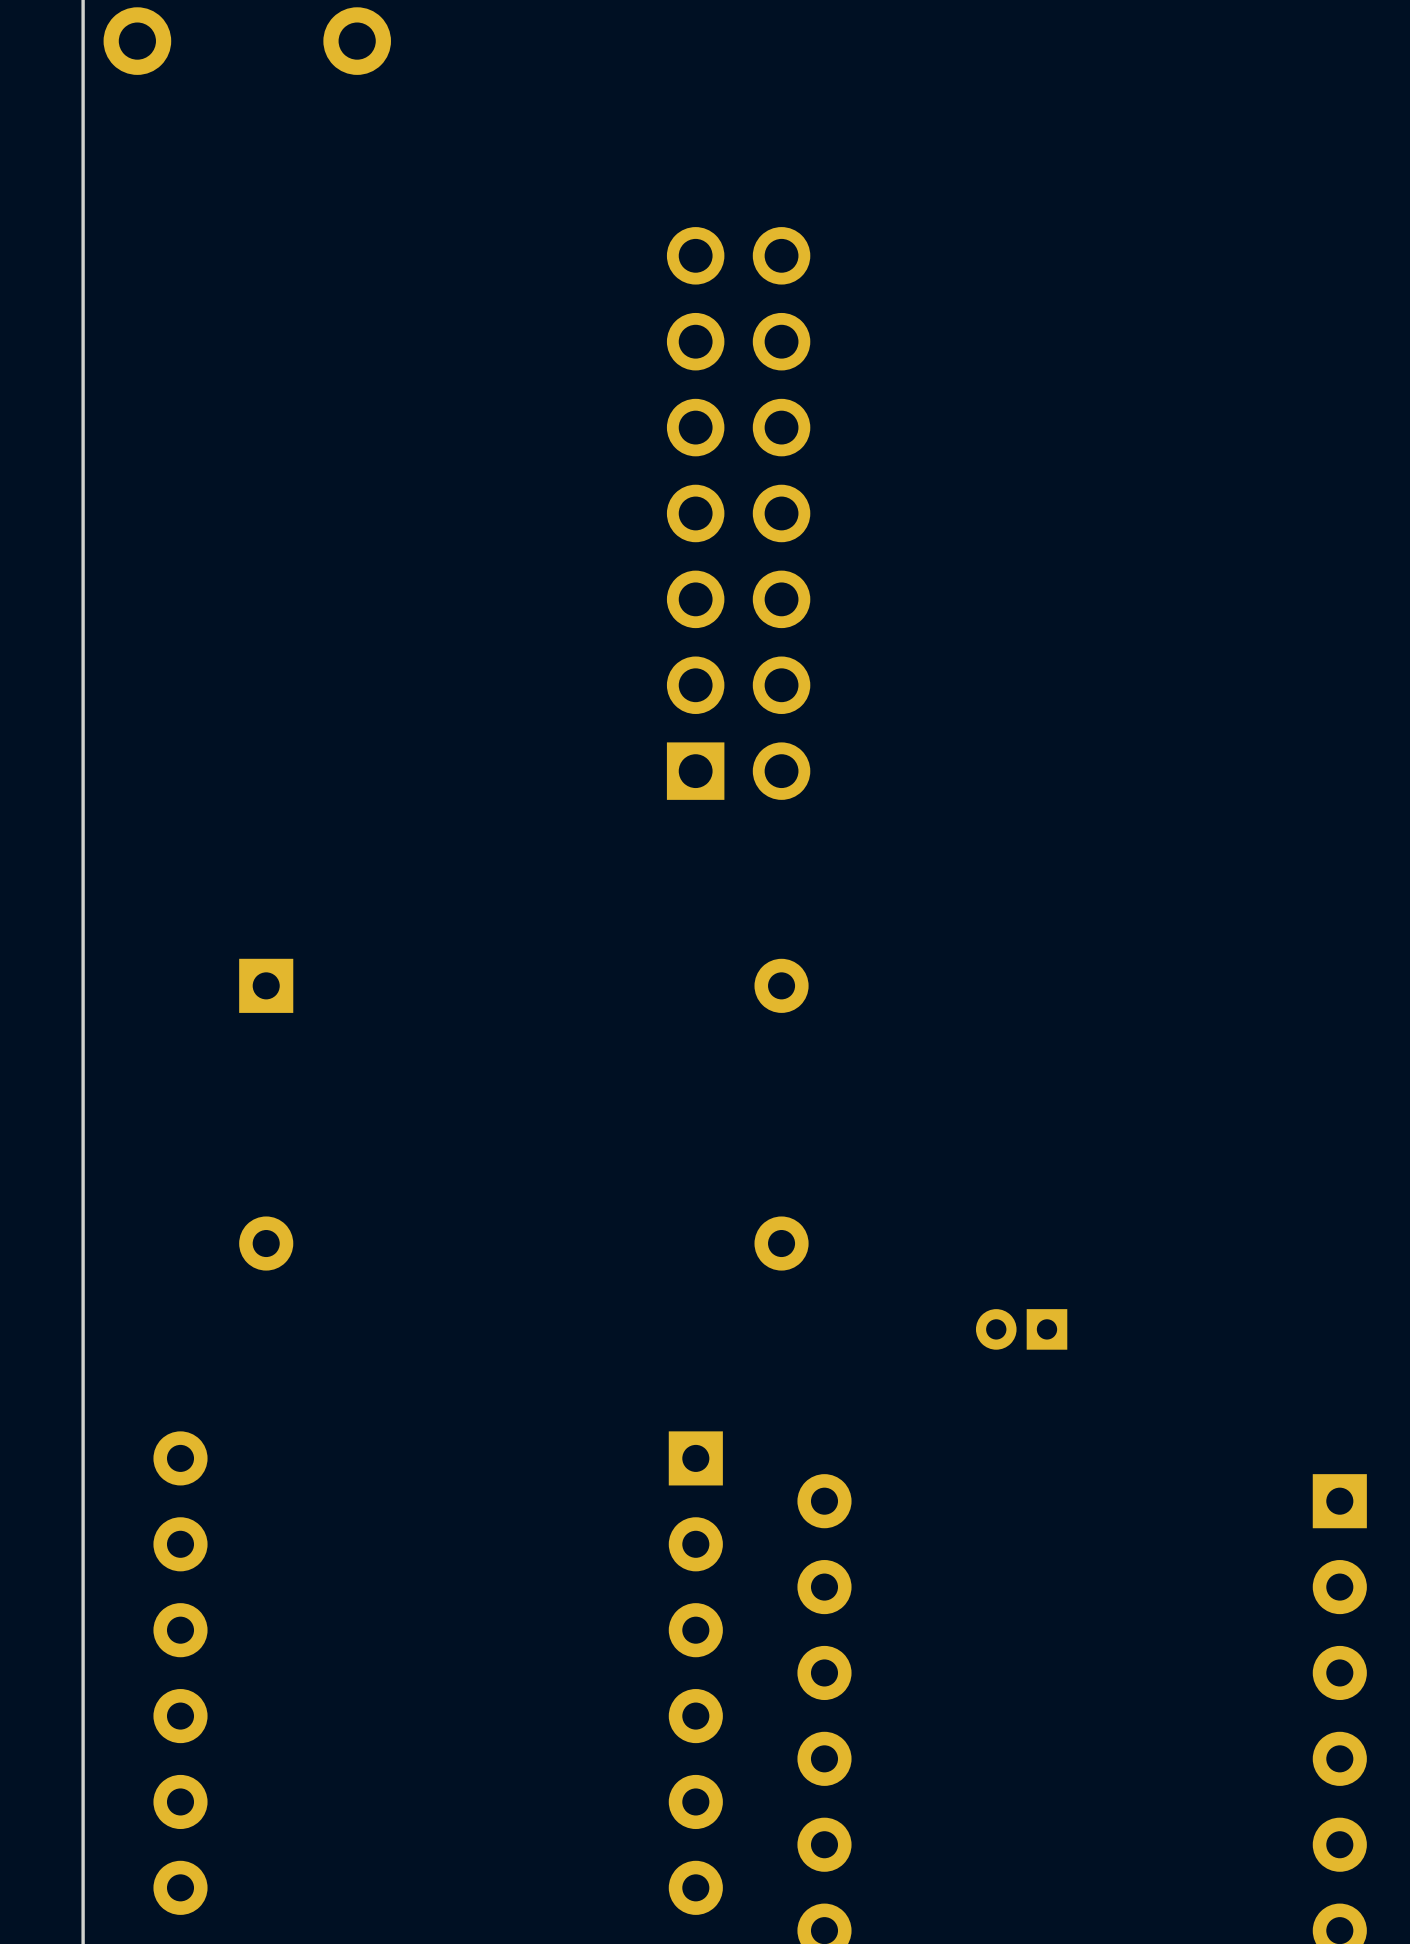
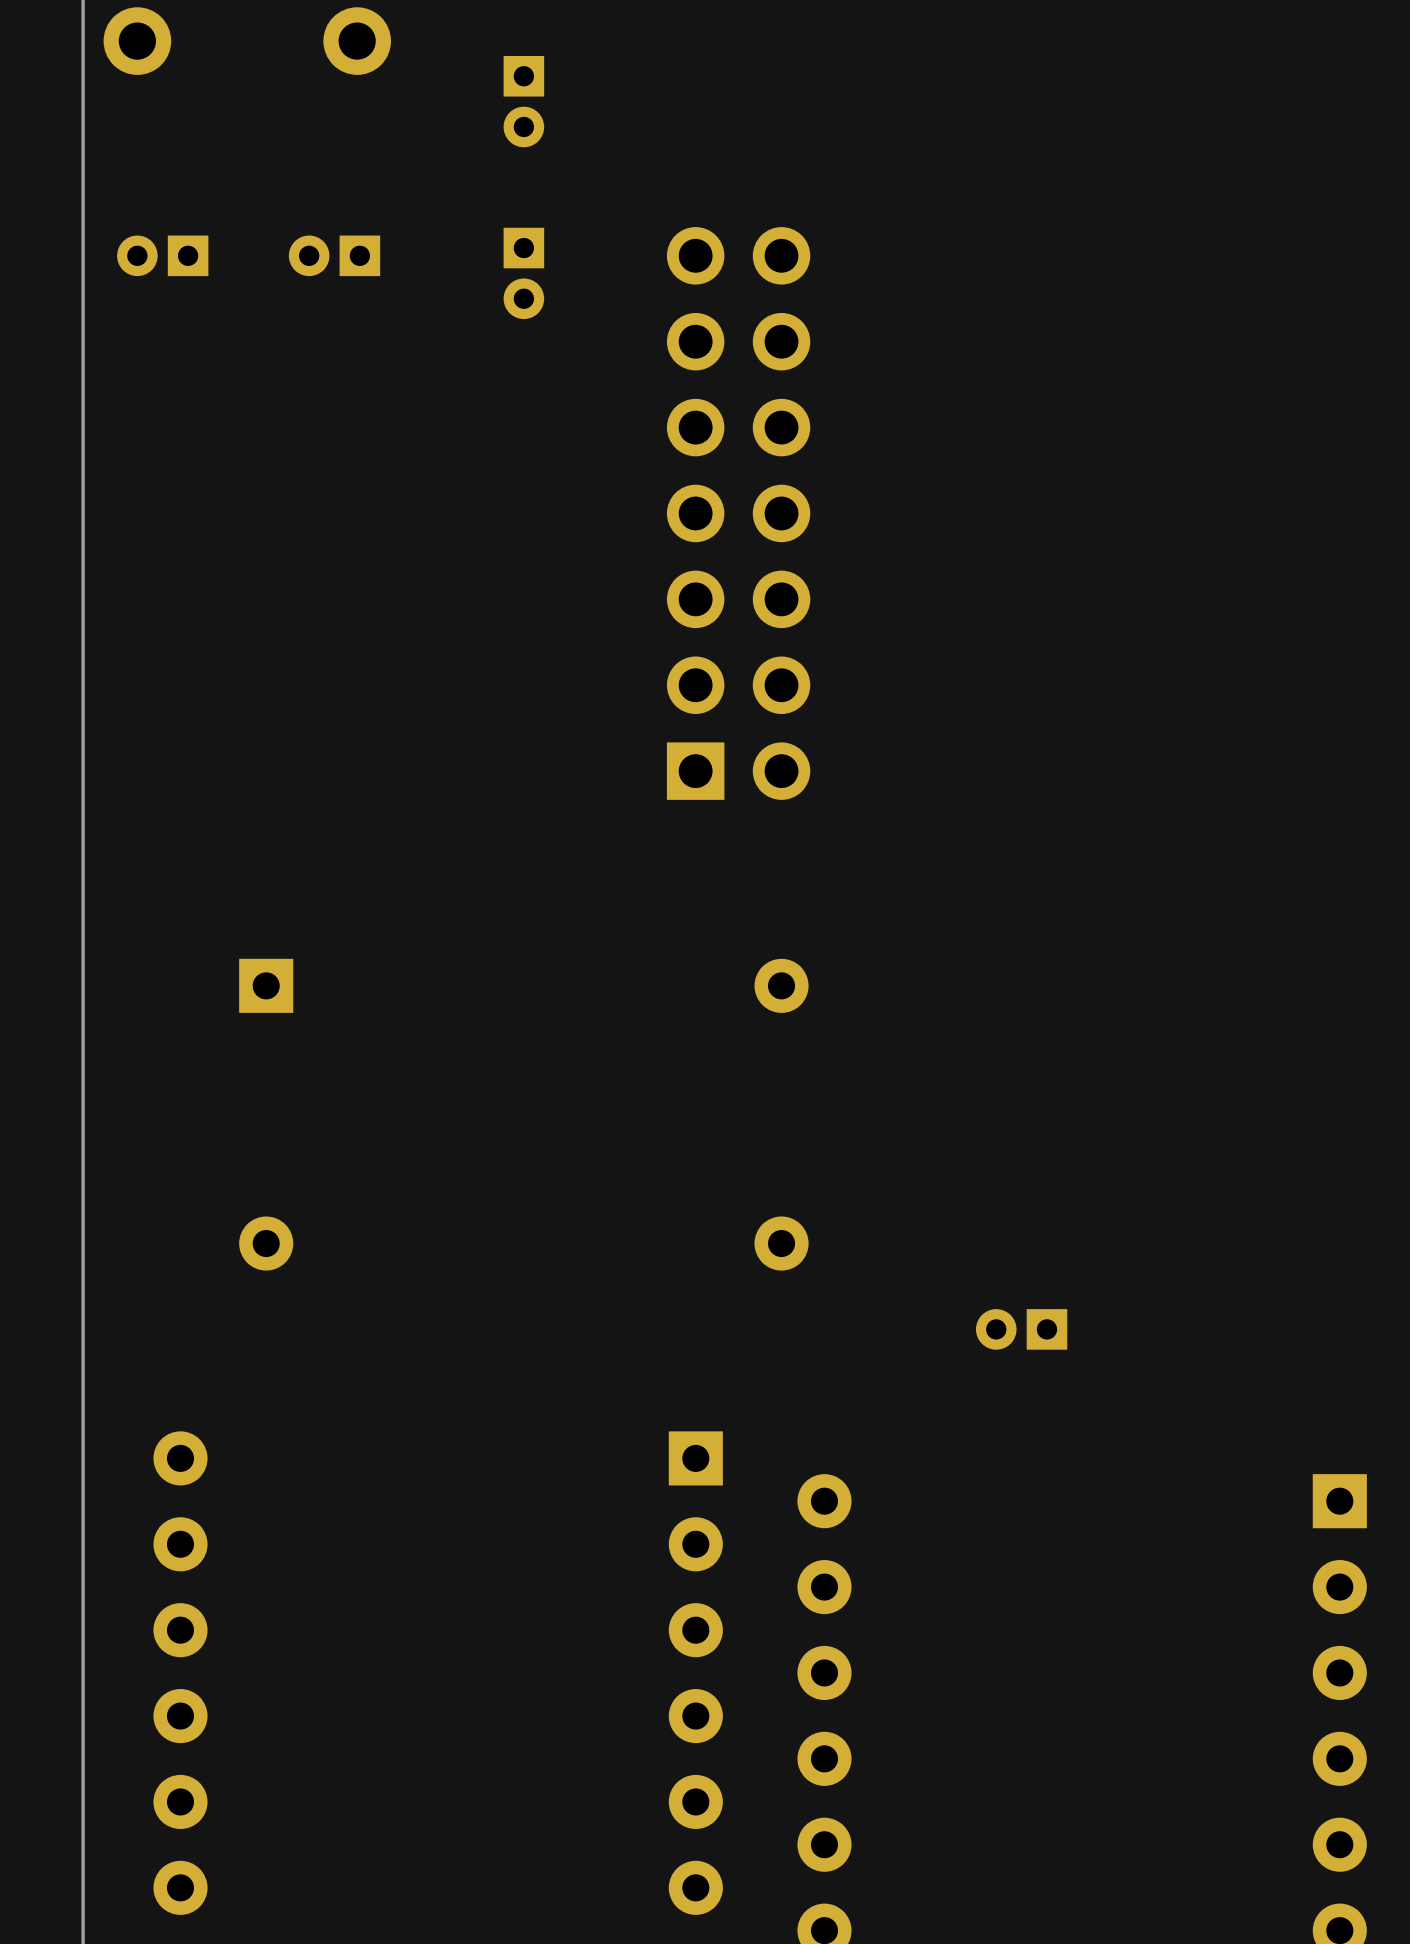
part: none -> (523, 101)
part: none -> (162, 255)
part: none -> (334, 255)
part: none -> (523, 273)

